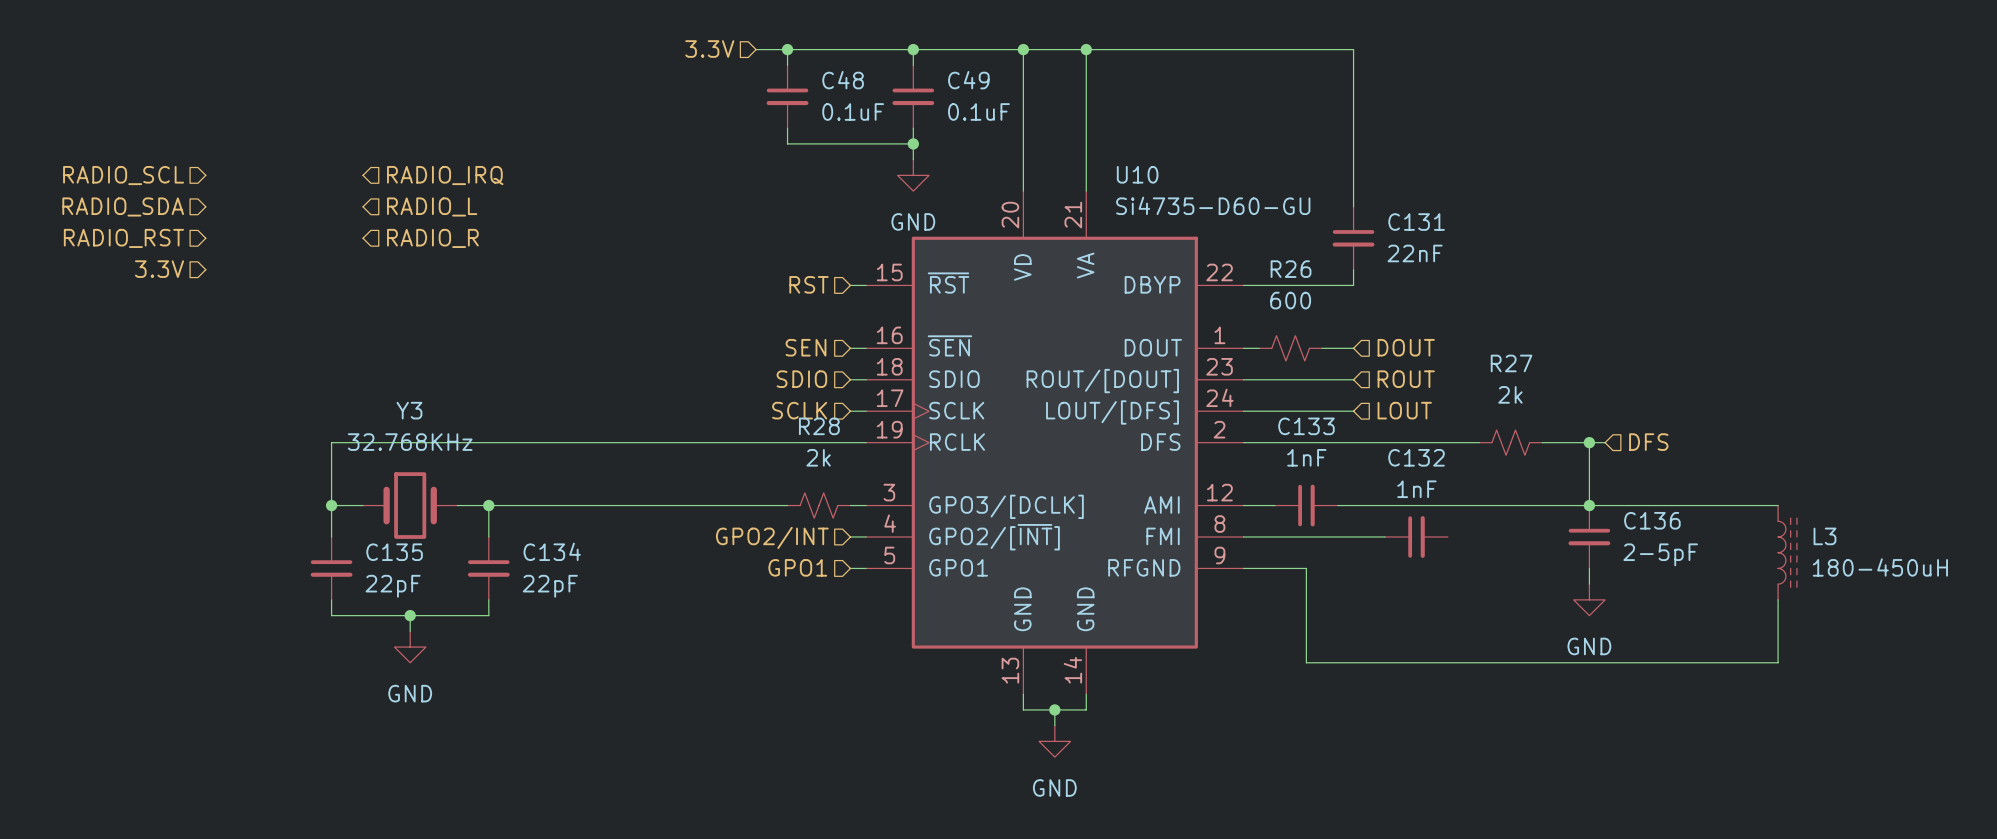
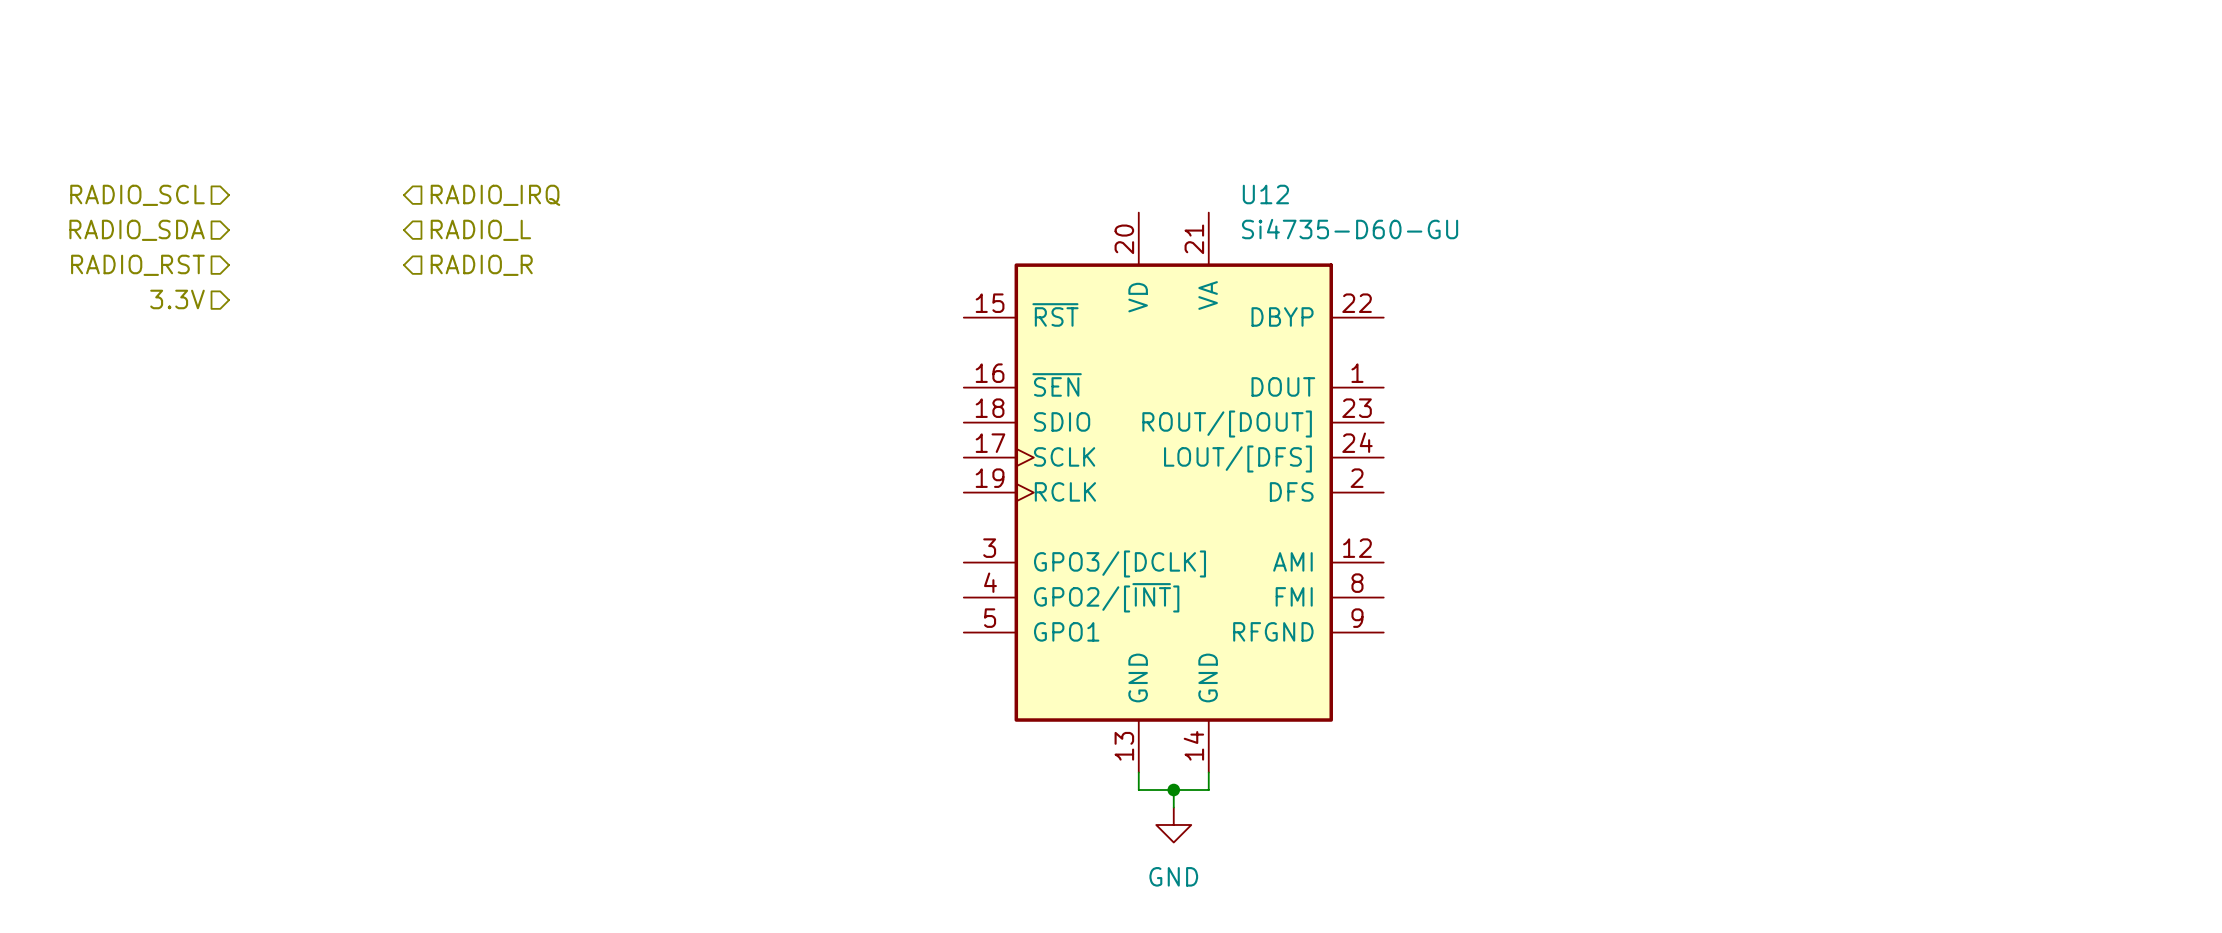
hierarchical label: 3.3V (709, 49) -> none
wire: (756, 49) (1353, 49) (1353, 206) -> none
wire: (787, 49) (787, 65) -> none
junction: (787, 49) -> none
wire: (913, 49) (913, 65) -> none
junction: (913, 49) -> none
wire: (1023, 49) (1023, 191) -> none
junction: (1023, 49) -> none
wire: (1086, 49) (1086, 191) -> none
junction: (1086, 49) -> none
C48: 0.1uF (787, 96) -> none
C49: 0.1uF (913, 96) -> none
wire: (787, 128) (787, 143) (913, 143) -> none
wire: (913, 128) (913, 159) -> none
junction: (913, 143) -> none
U10 name: U10 (1137, 174) -> U12 (1265, 194)
power symbol: GND (913, 175) -> none
C131: 22nF (1353, 238) -> none
wire: (1353, 269) (1353, 285) (1243, 285) -> none
hierarchical label: RST (809, 284) -> none
wire: (850, 285) (866, 285) -> none
hierarchical label: SEN (806, 347) -> none
hierarchical label: DOUT (1406, 347) -> none
wire: (850, 348) (866, 348) -> none
wire: (1243, 348) (1259, 348) -> none
R26: 600 (1290, 348) -> none
wire: (1322, 348) (1353, 348) -> none
hierarchical label: SDIO (801, 379) -> none
wire: (850, 379) (866, 379) -> none
wire: (1243, 379) (1353, 379) -> none
hierarchical label: ROUT (1406, 379) -> none
hierarchical label: SCLK (799, 410) -> none
hierarchical label: LOUT (1404, 410) -> none
wire: (850, 411) (866, 411) -> none
wire: (1243, 411) (1353, 411) -> none
wire: (866, 442) (331, 442) (331, 537) -> none
wire: (1243, 442) (1479, 442) -> none
R27: 2k (1510, 442) -> none
wire: (1542, 442) (1605, 442) -> none
wire: (1589, 442) (1589, 505) -> none
junction: (1589, 442) -> none
hierarchical label: DFS (1648, 442) -> none
wire: (331, 505) (363, 505) -> none
junction: (331, 505) -> none
Y3: 32.768KHz (410, 505) -> none
wire: (457, 505) (787, 505) -> none
wire: (488, 505) (488, 537) -> none
junction: (488, 505) -> none
R28: 2k (818, 505) -> none
wire: (850, 505) (866, 505) -> none
wire: (1243, 505) (1274, 505) -> none
C133: 1nF (1306, 505) -> none
wire: (1337, 505) (1778, 505) -> none
junction: (1589, 505) -> none
hierarchical label: GPO2/INT (772, 537) -> none
wire: (850, 537) (866, 537) -> none
wire: (1243, 537) (1385, 537) -> none
C132: 1nF (1416, 537) -> none
C136: 2-5pF (1589, 537) -> none
L3: 180-450uH (1787, 552) -> none
hierarchical label: GPO1 (797, 567) -> none
C135: 22pF (331, 568) -> none
C134: 22pF (488, 568) -> none
wire: (850, 568) (866, 568) -> none
wire: (1243, 568) (1306, 568) (1306, 662) (1778, 662) (1778, 599) -> none
wire: (1589, 568) (1589, 584) -> none
wire: (331, 599) (331, 615) (488, 615) (488, 599) -> none
power symbol: GND (1589, 599) -> none
wire: (410, 615) (410, 631) -> none
junction: (410, 615) -> none
power symbol: GND (410, 647) -> none

